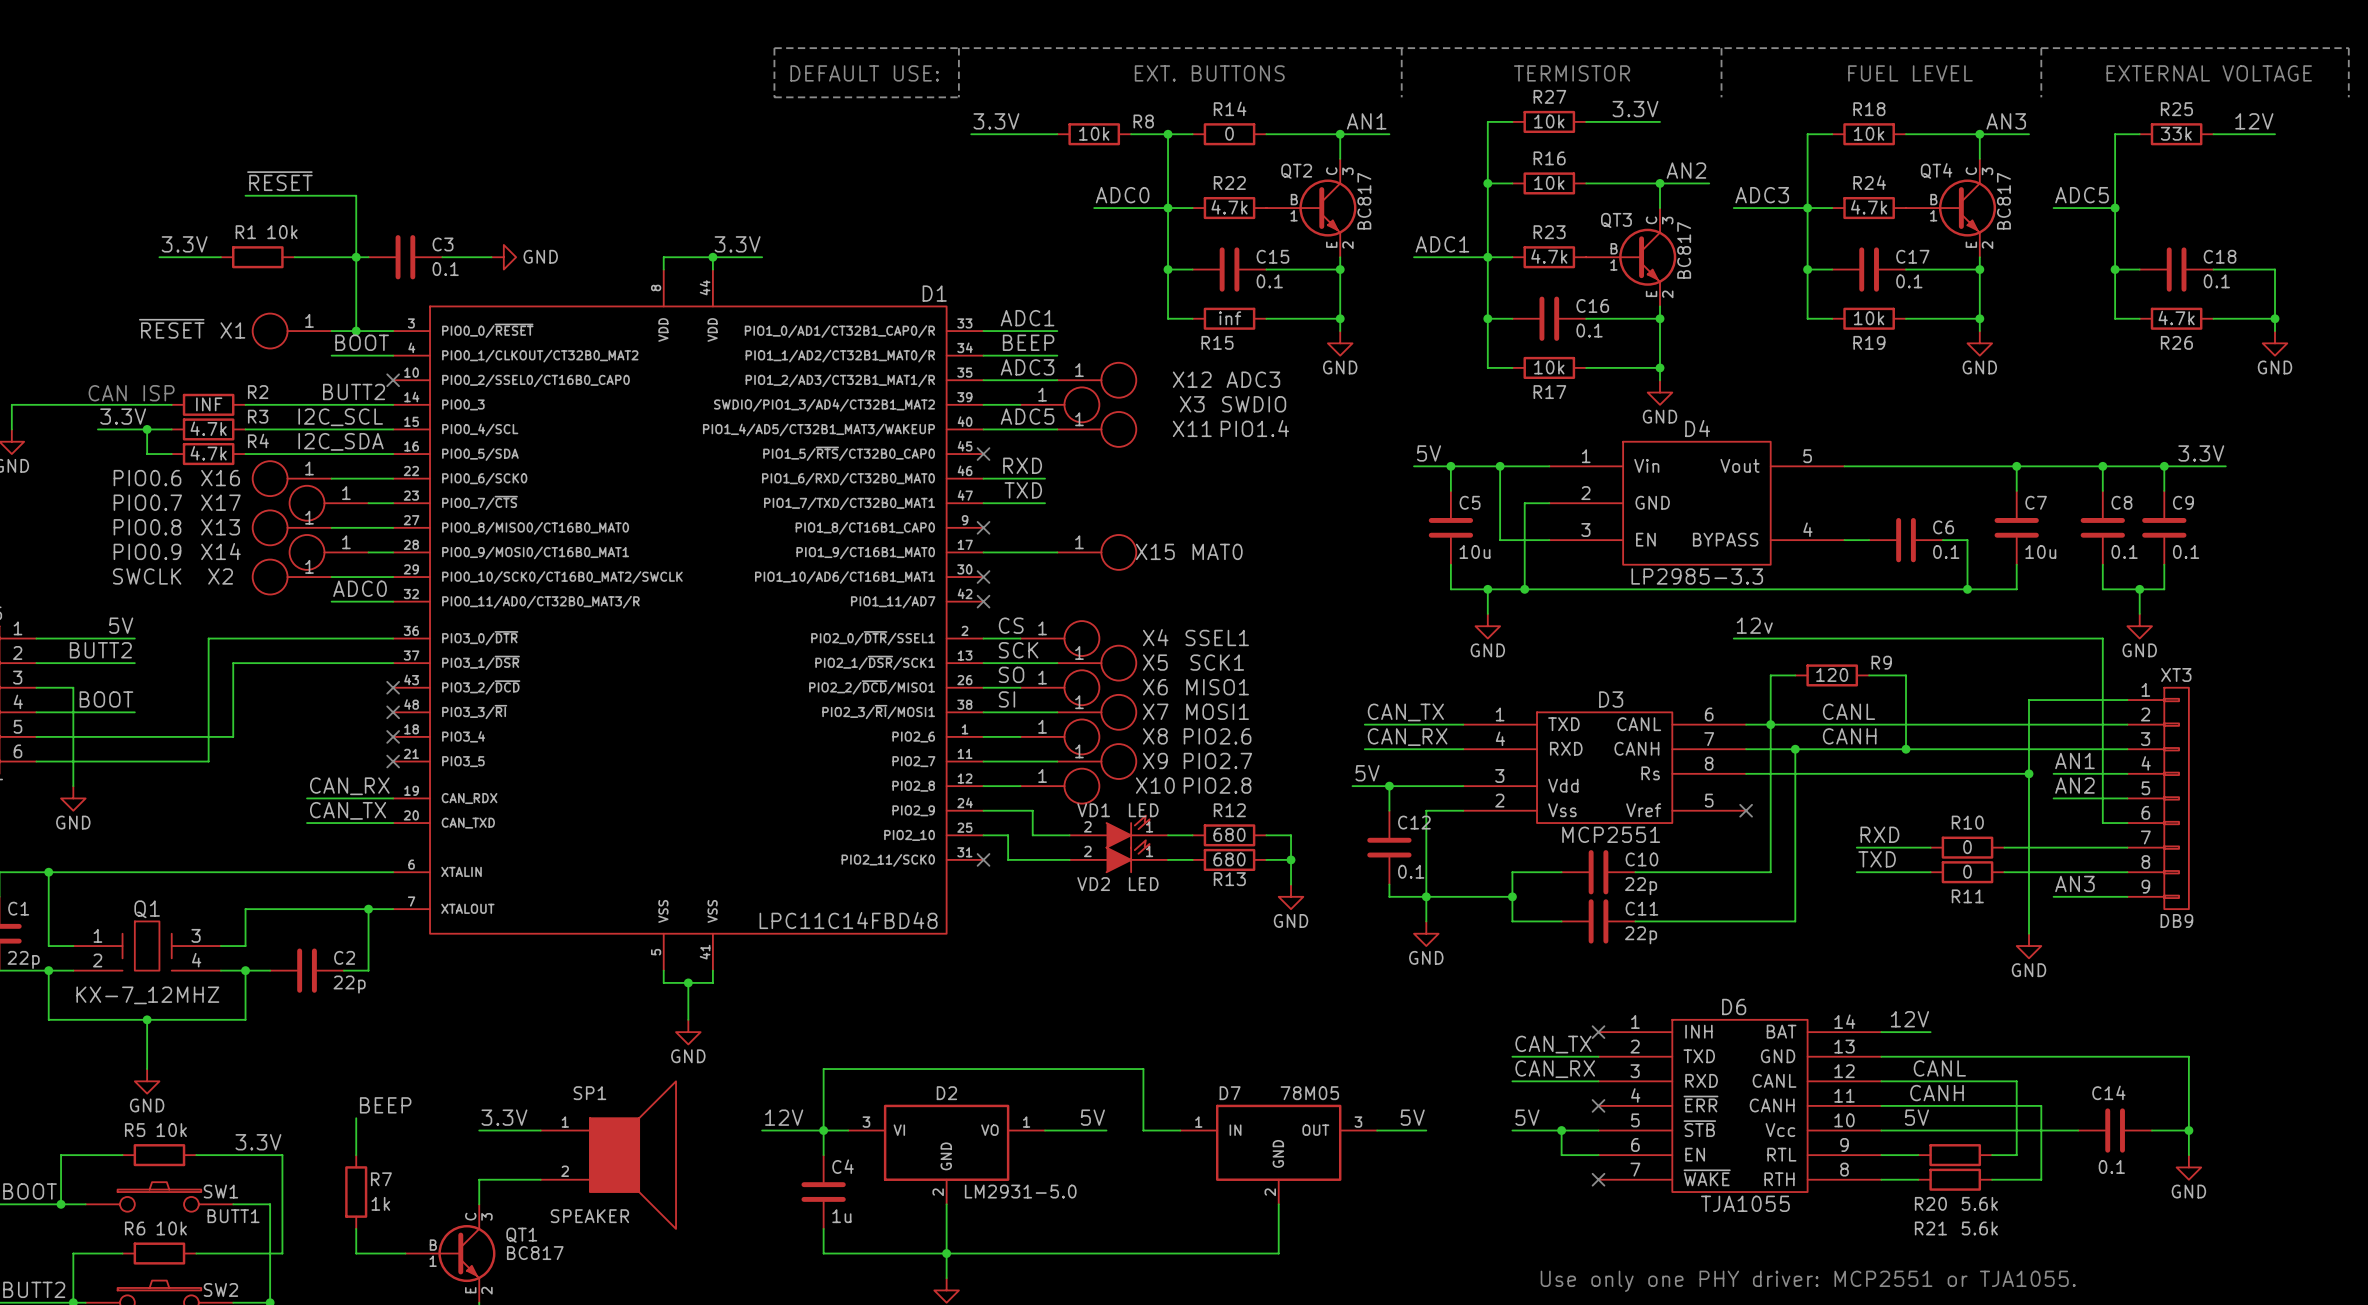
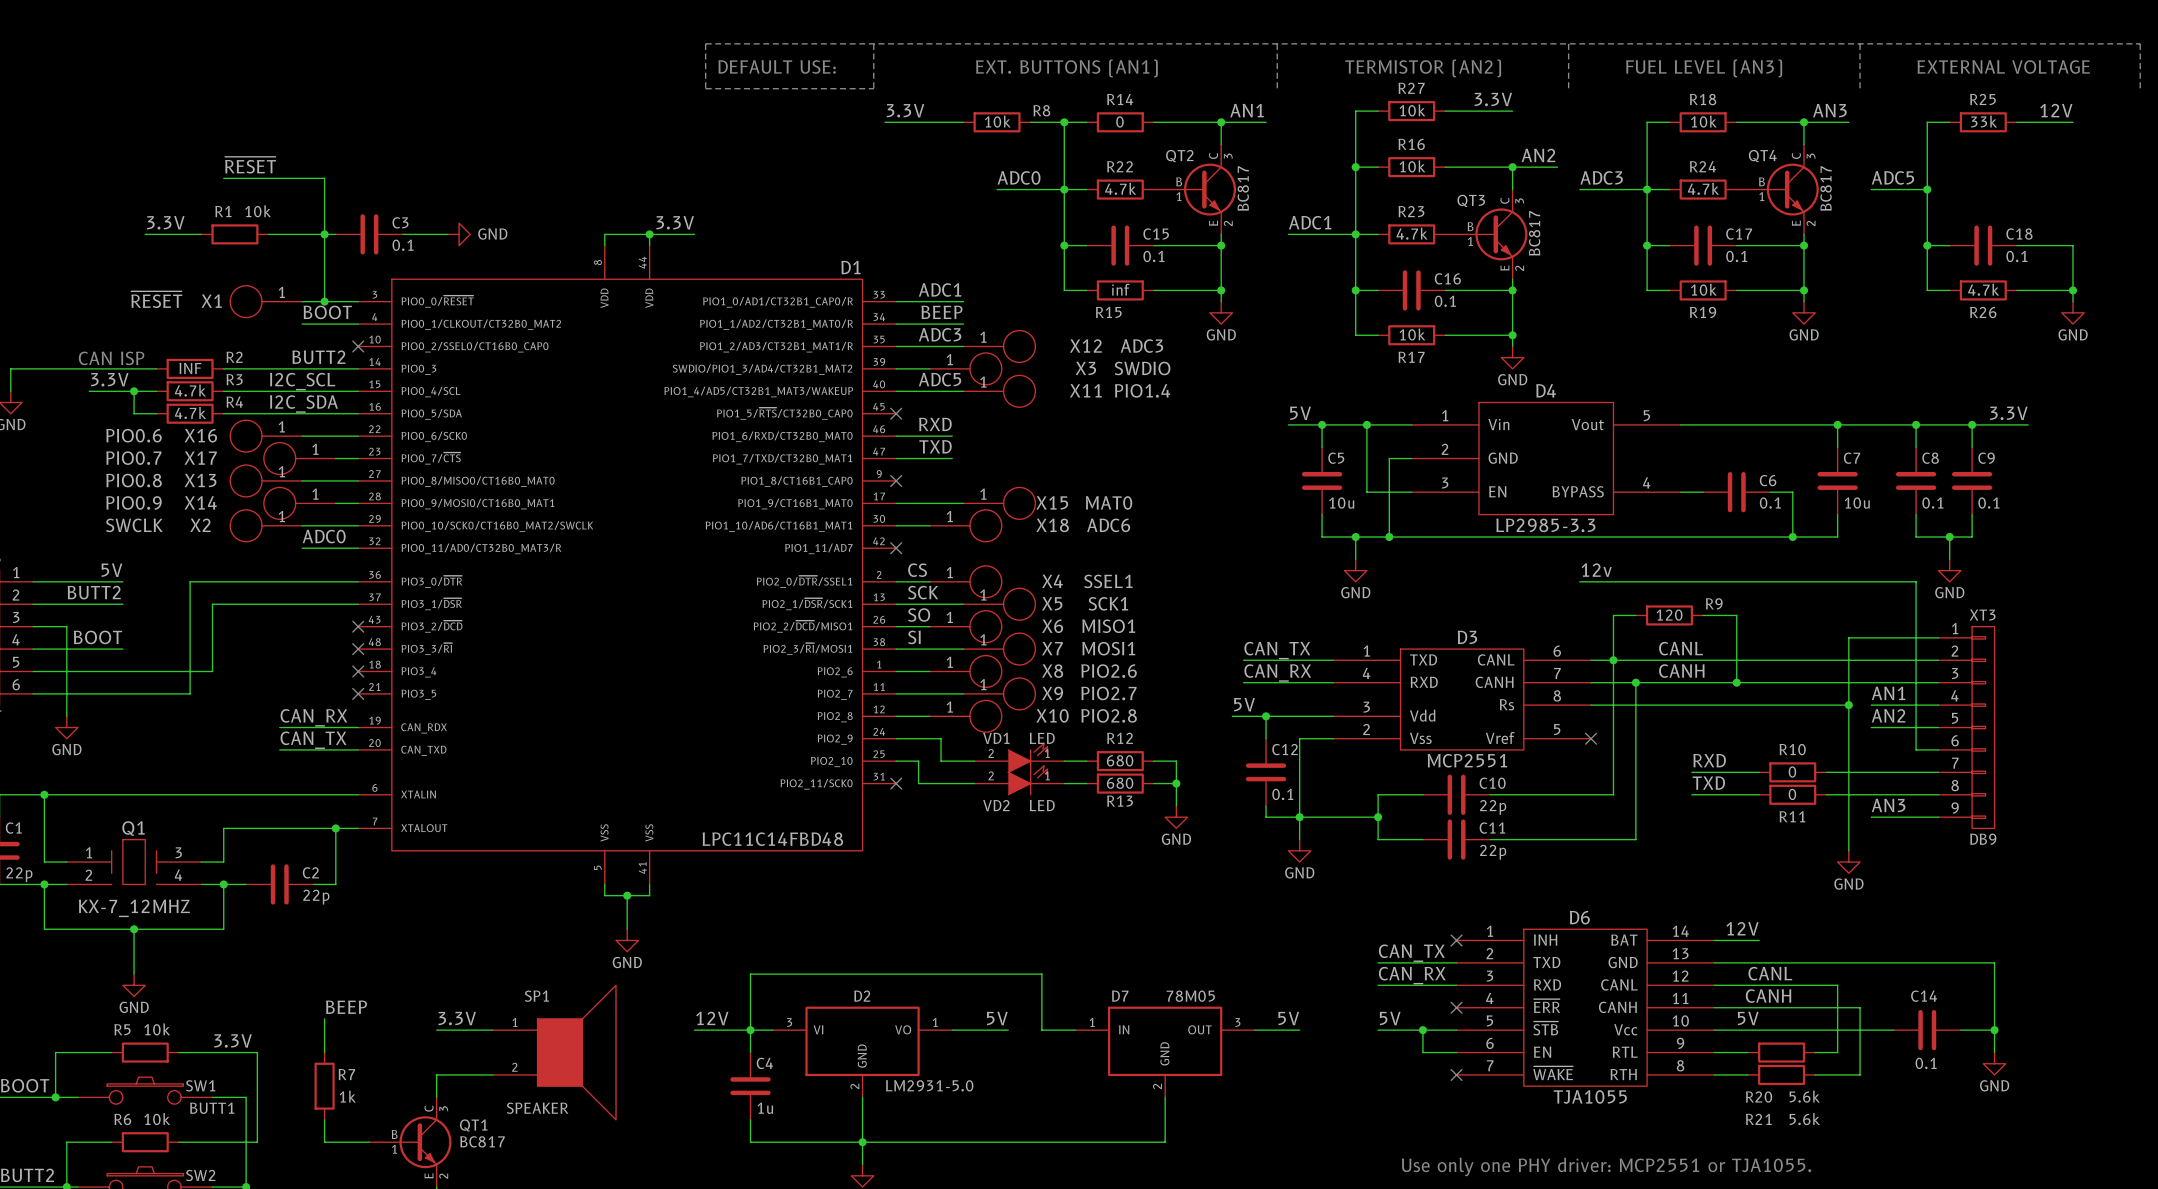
text: EXT. BUTTONS (1209, 73) -> EXT. BUTTONS (AN1) (1066, 68)
text: TERMISTOR (1572, 73) -> TERMISTOR (AN2) (1423, 68)
text: FUEL LEVEL (1910, 73) -> FUEL LEVEL (AN3) (1704, 68)
wire: none -> (896, 525) (929, 525)
no-connect mark: (983, 577) -> none
X18: none -> ADC6 (965, 525)

